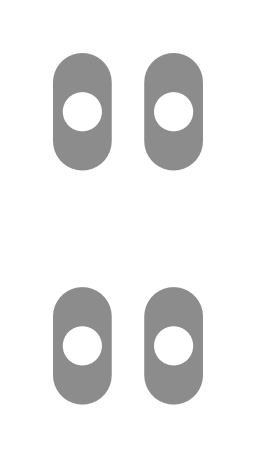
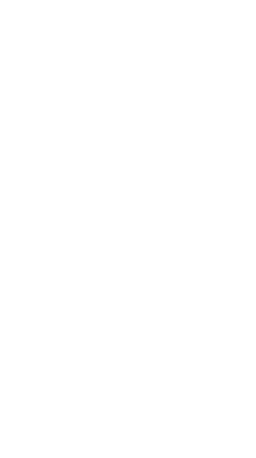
part: (127, 111) -> none
part: (127, 345) -> none

